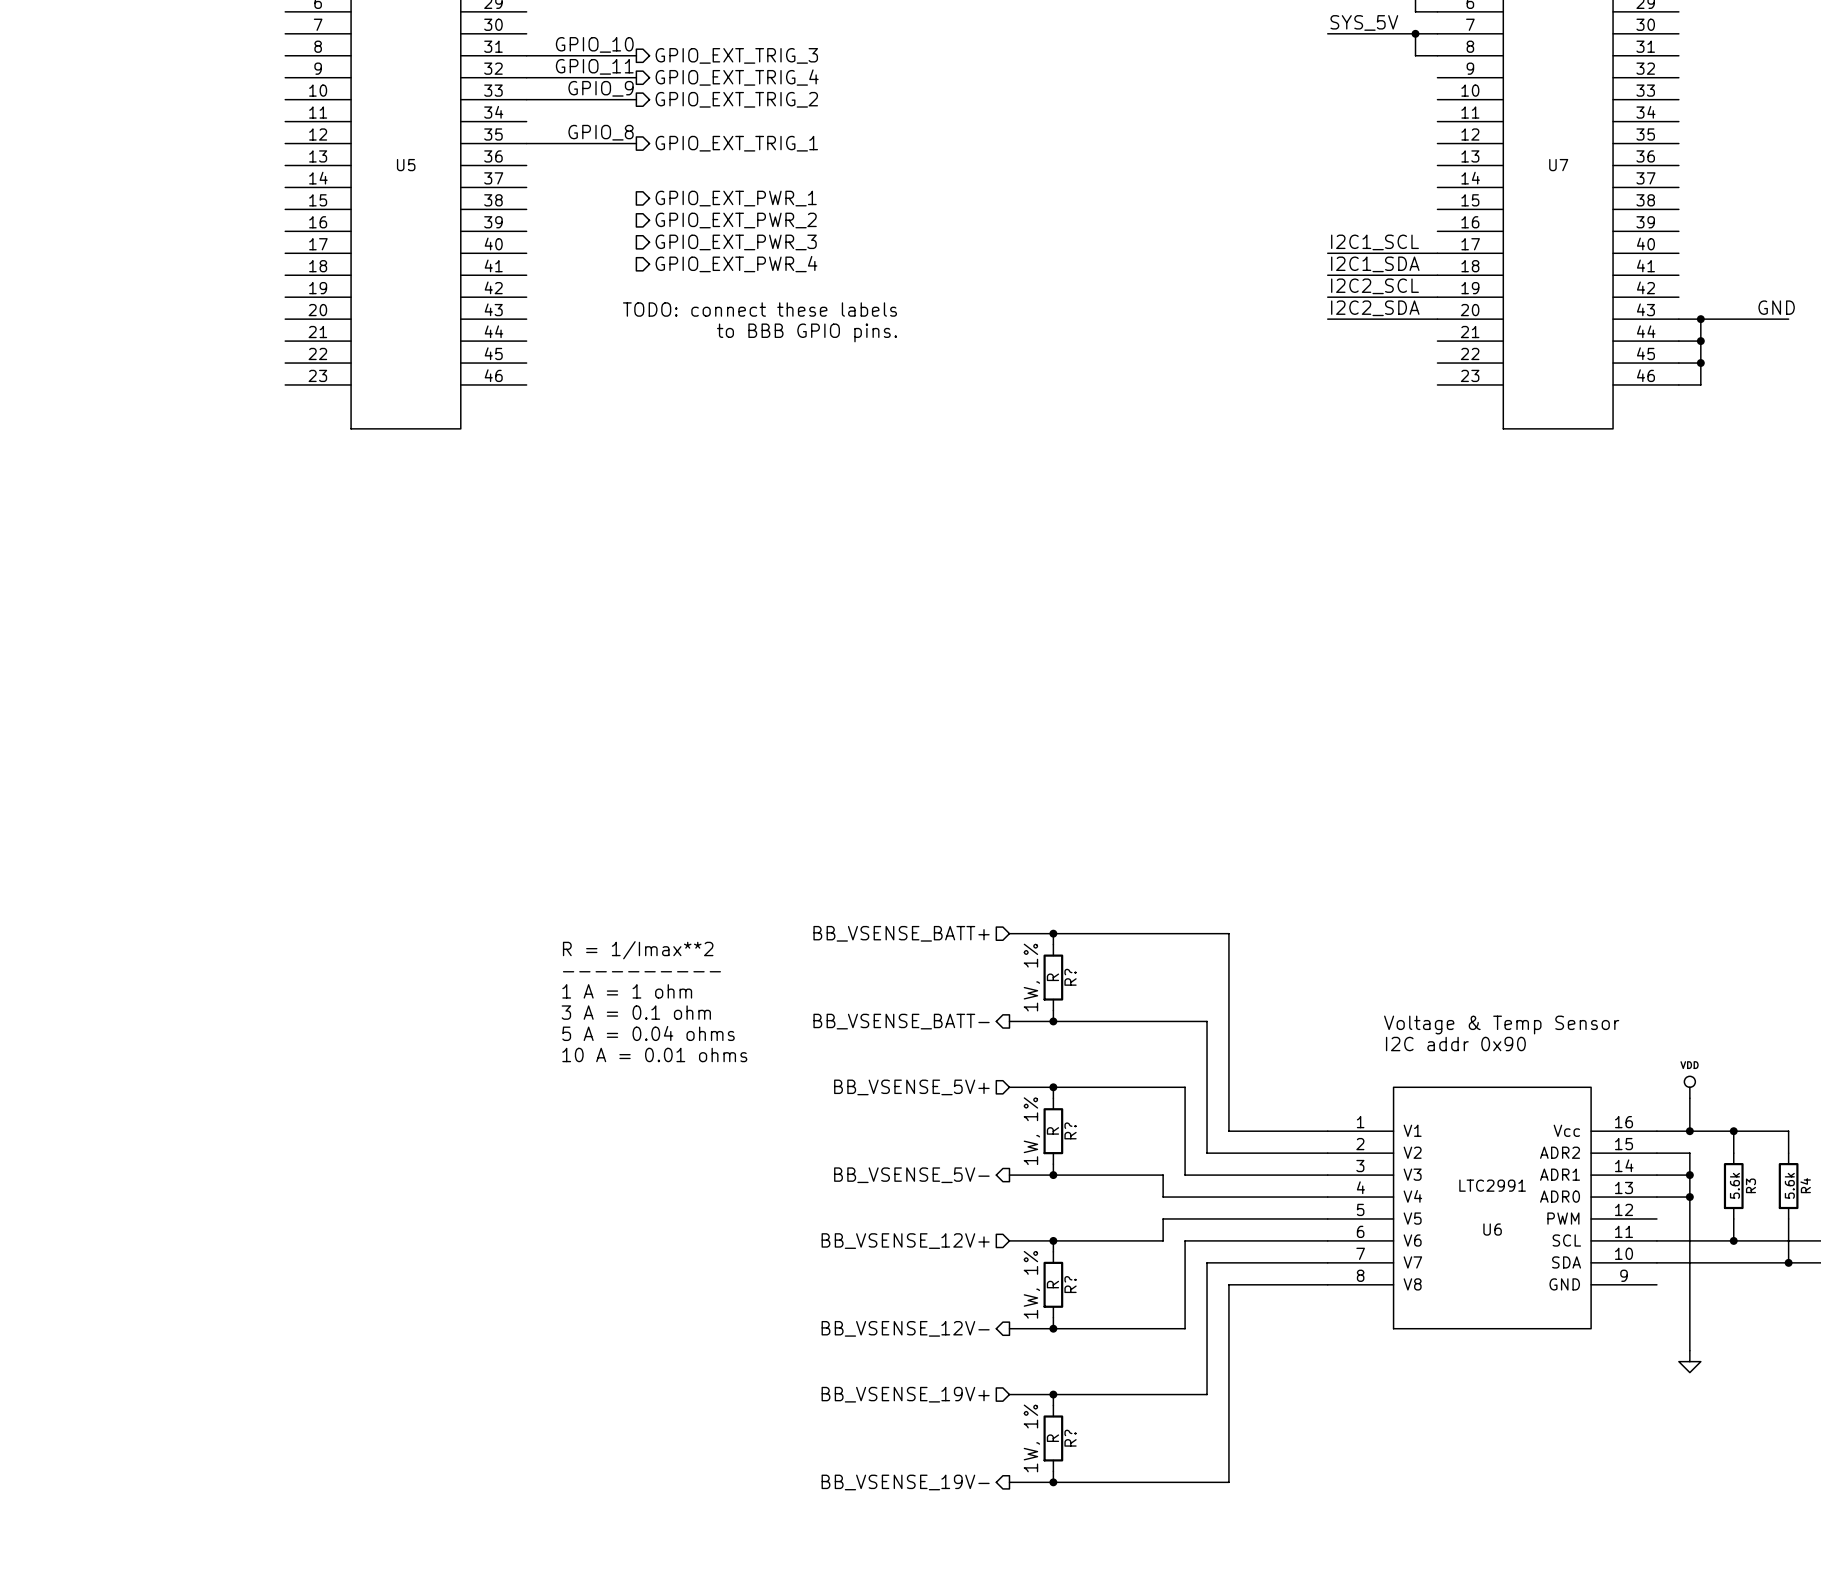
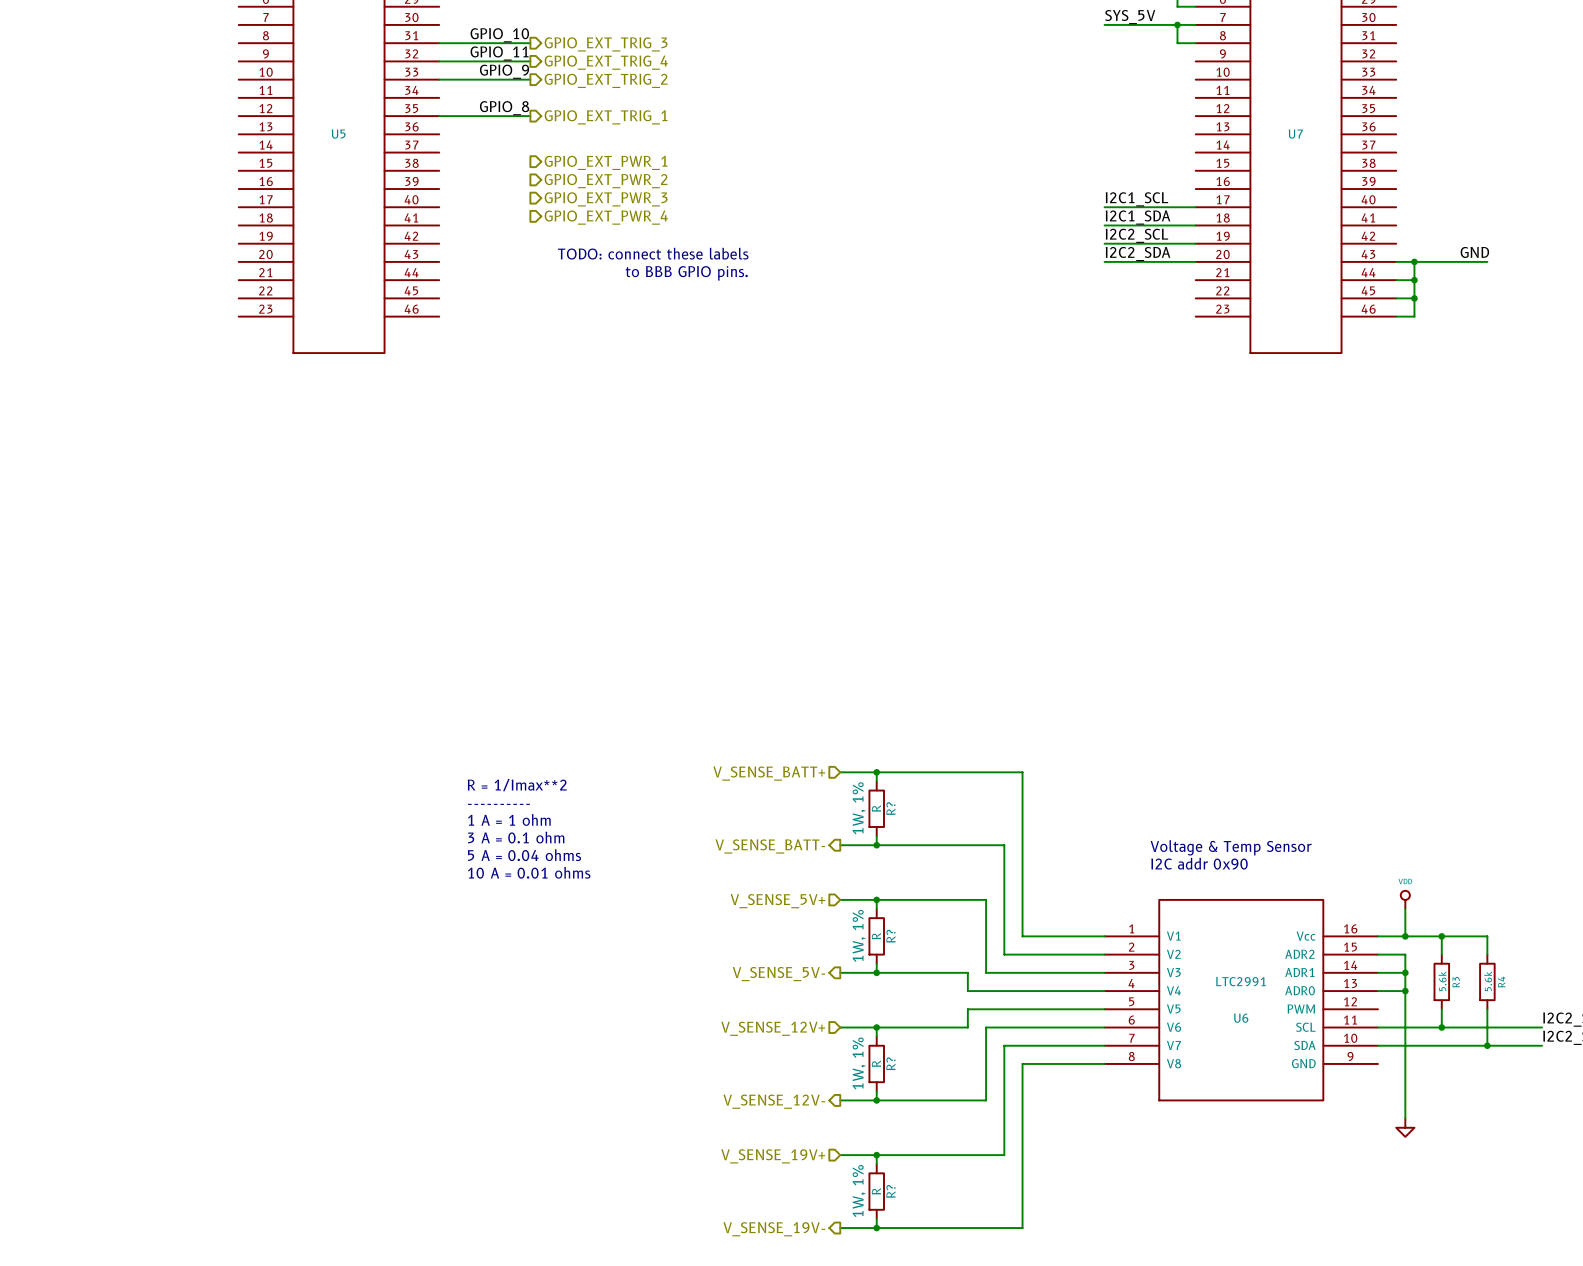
hierarchical label: BB_VSENSE_BATT+ (901, 933) -> V_SENSE_BATT+ (769, 773)
hierarchical label: BB_VSENSE_BATT- (901, 1021) -> V_SENSE_BATT- (770, 846)
hierarchical label: BB_VSENSE_5V+ (911, 1087) -> V_SENSE_5V+ (777, 901)
hierarchical label: BB_VSENSE_5V- (911, 1175) -> V_SENSE_5V- (778, 974)
hierarchical label: BB_VSENSE_12V+ (905, 1241) -> V_SENSE_12V+ (773, 1028)
hierarchical label: BB_VSENSE_12V- (905, 1328) -> V_SENSE_12V- (774, 1101)
hierarchical label: BB_VSENSE_19V+ (905, 1394) -> V_SENSE_19V+ (773, 1156)
hierarchical label: BB_VSENSE_19V- (905, 1482) -> V_SENSE_19V- (774, 1229)

